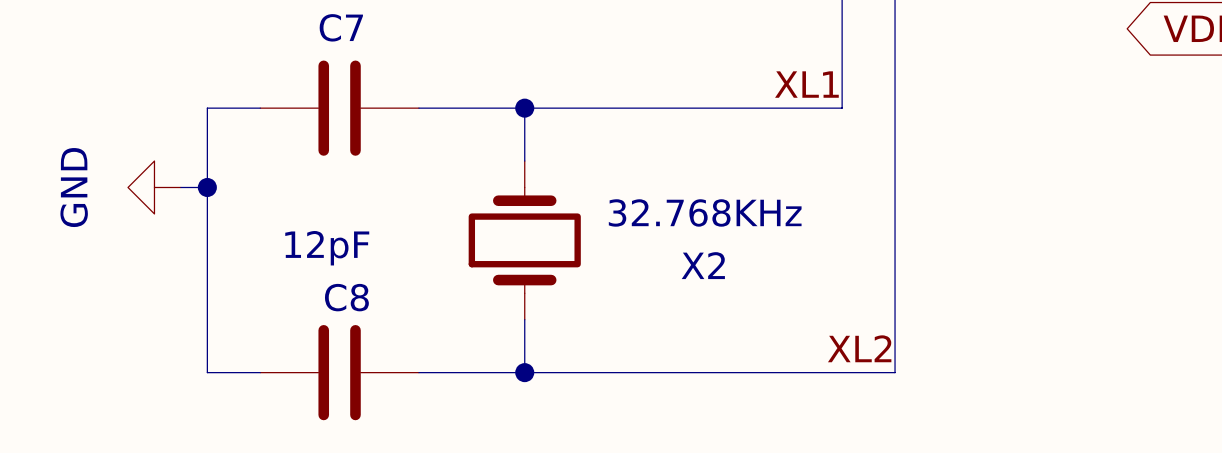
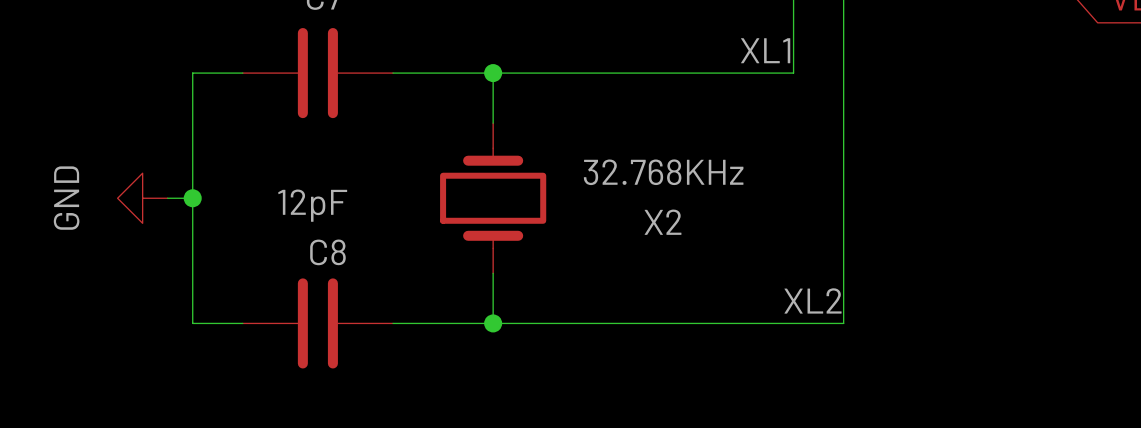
power symbol position: GND (154, 187) -> GND (142, 198)
wire: (180, 187) (207, 187) -> (167, 198) (192, 198)
junction position: (207, 187) -> (192, 198)

